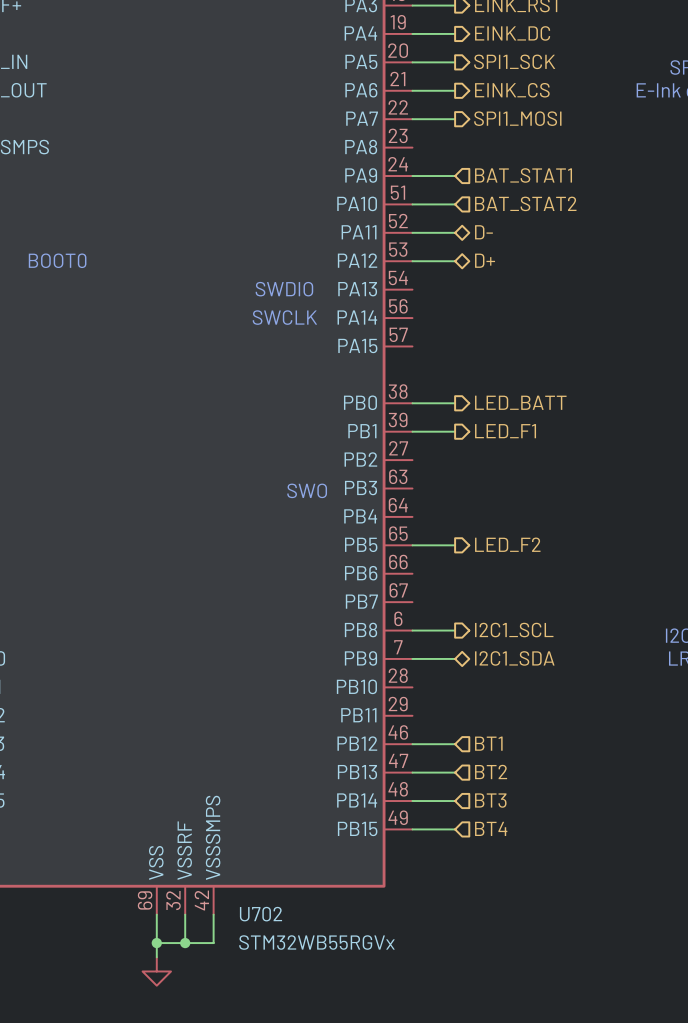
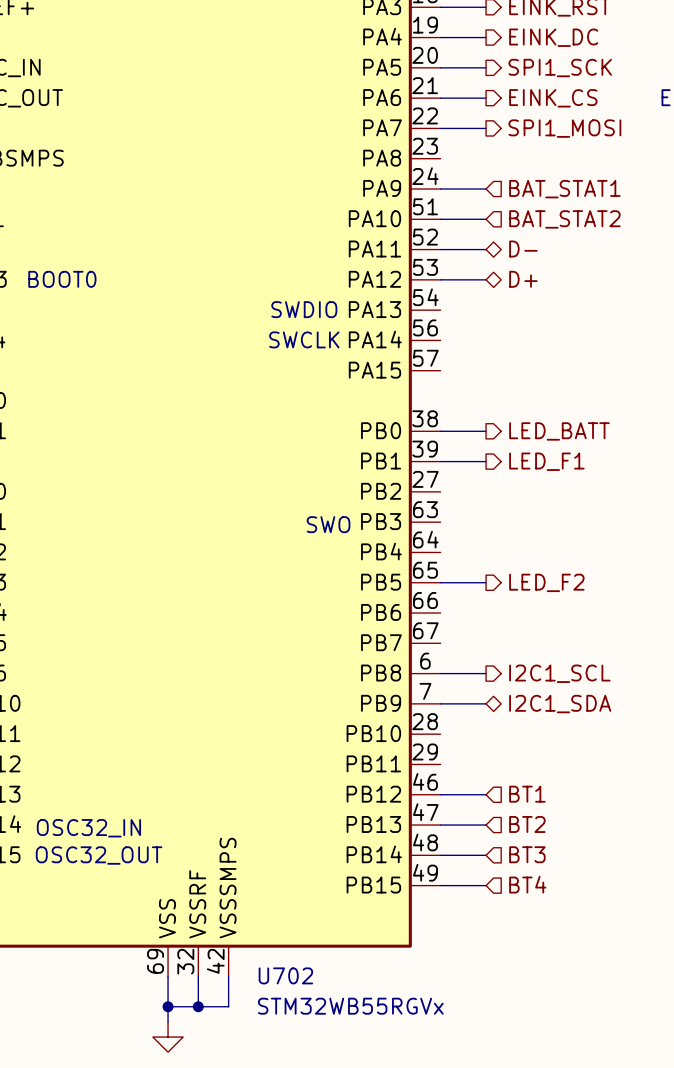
text: none -> OSC32_IN (88, 828)
text: none -> OSC32_OUT (99, 855)

